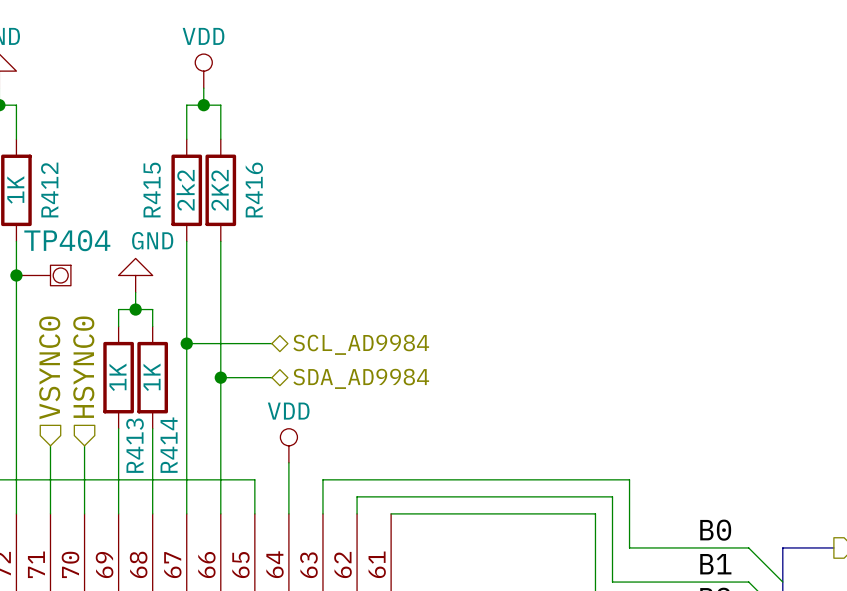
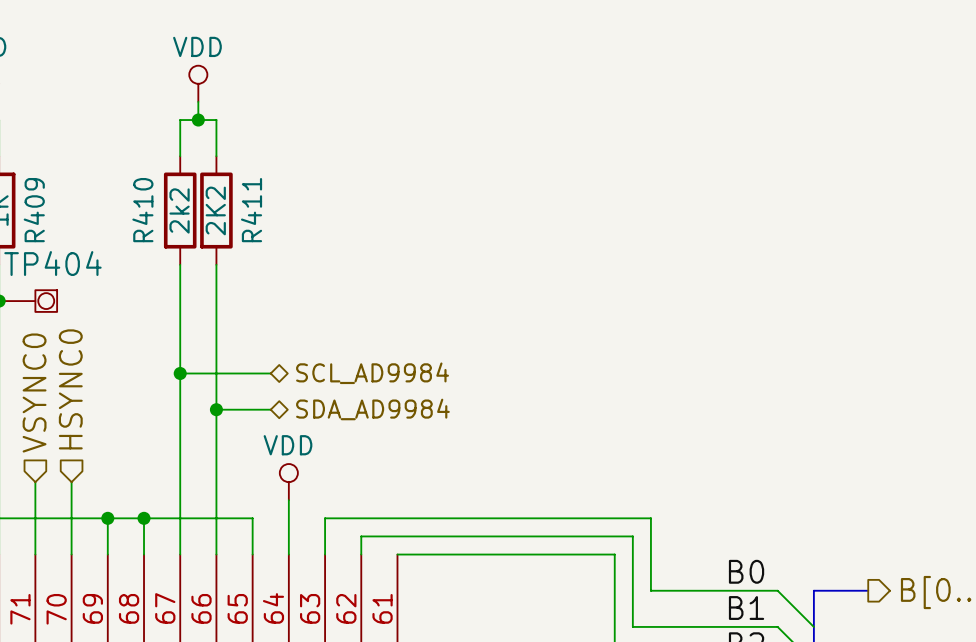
R412 name: R412 (49, 190) -> R409 (34, 210)
R415 name: R415 (152, 190) -> R410 (142, 210)
R416 name: R416 (254, 190) -> R411 (251, 210)
power symbol: GND (135, 275) -> none
wire: (135, 292) (135, 309) -> none
junction: (135, 309) -> none
wire: (118, 326) (118, 309) (152, 309) (152, 326) -> none
R413: 1K (118, 377) -> none
R414: 1K (152, 377) -> none
wire: (118, 428) (118, 479) -> none
wire: (152, 428) (152, 479) -> none
junction: none -> (107, 518)
junction: none -> (144, 518)

